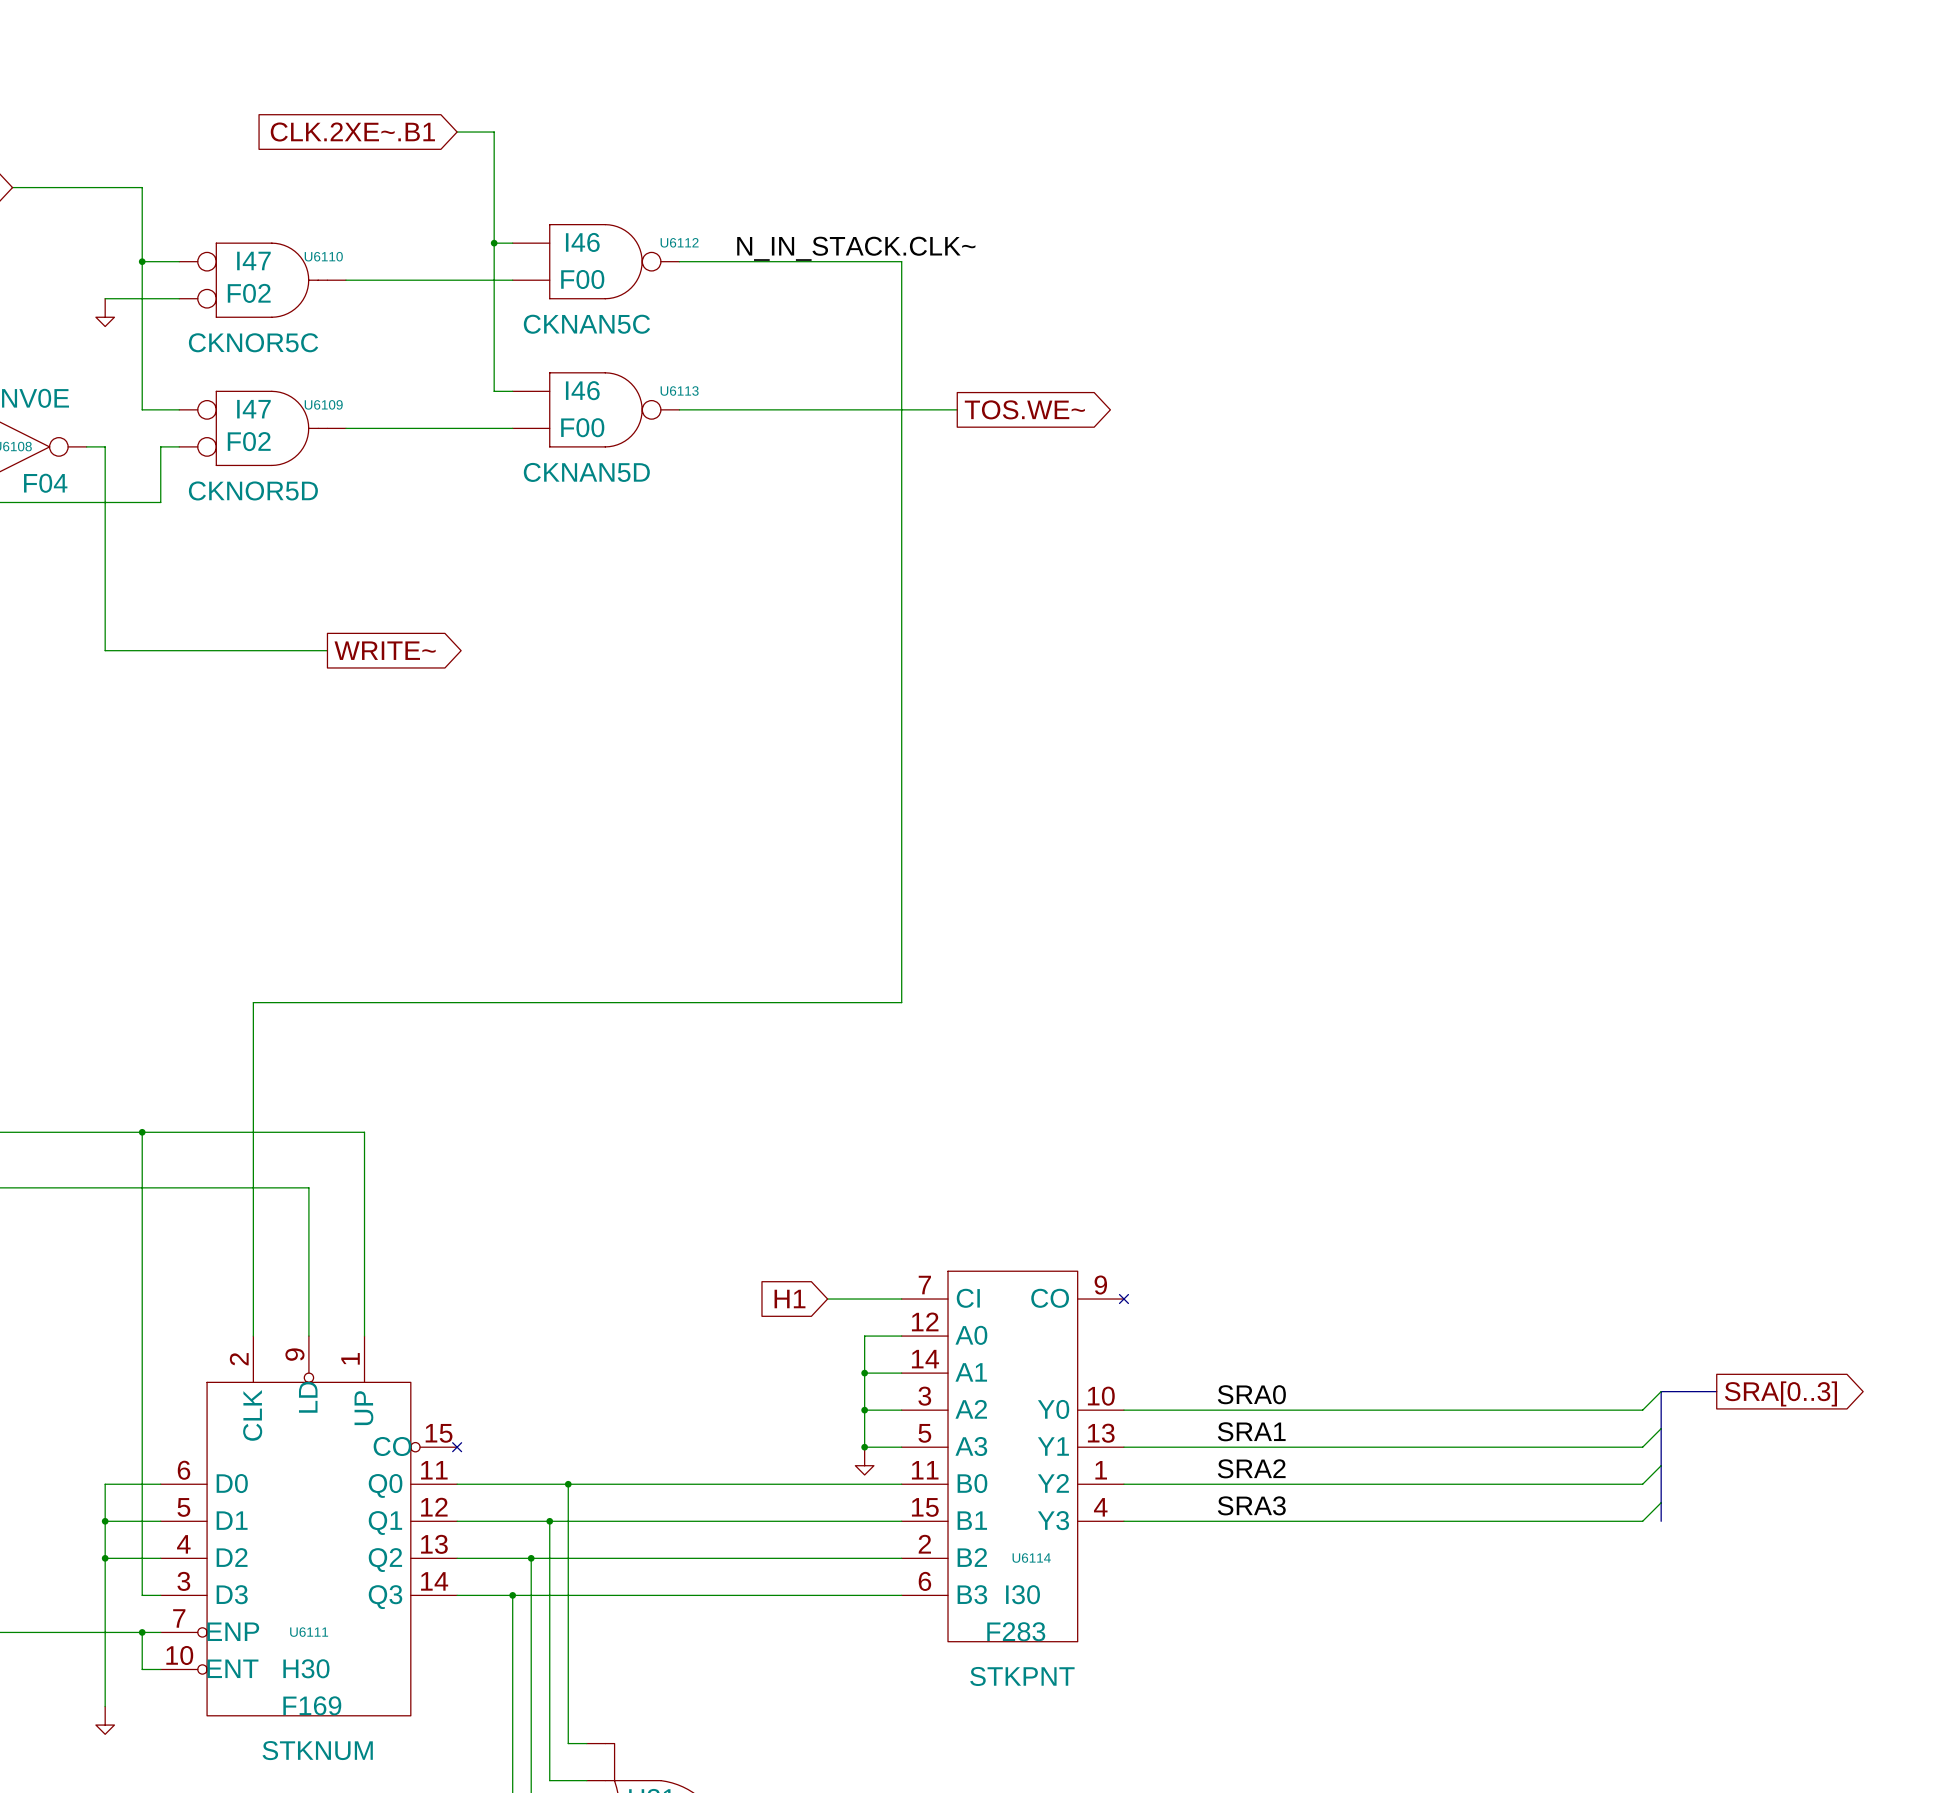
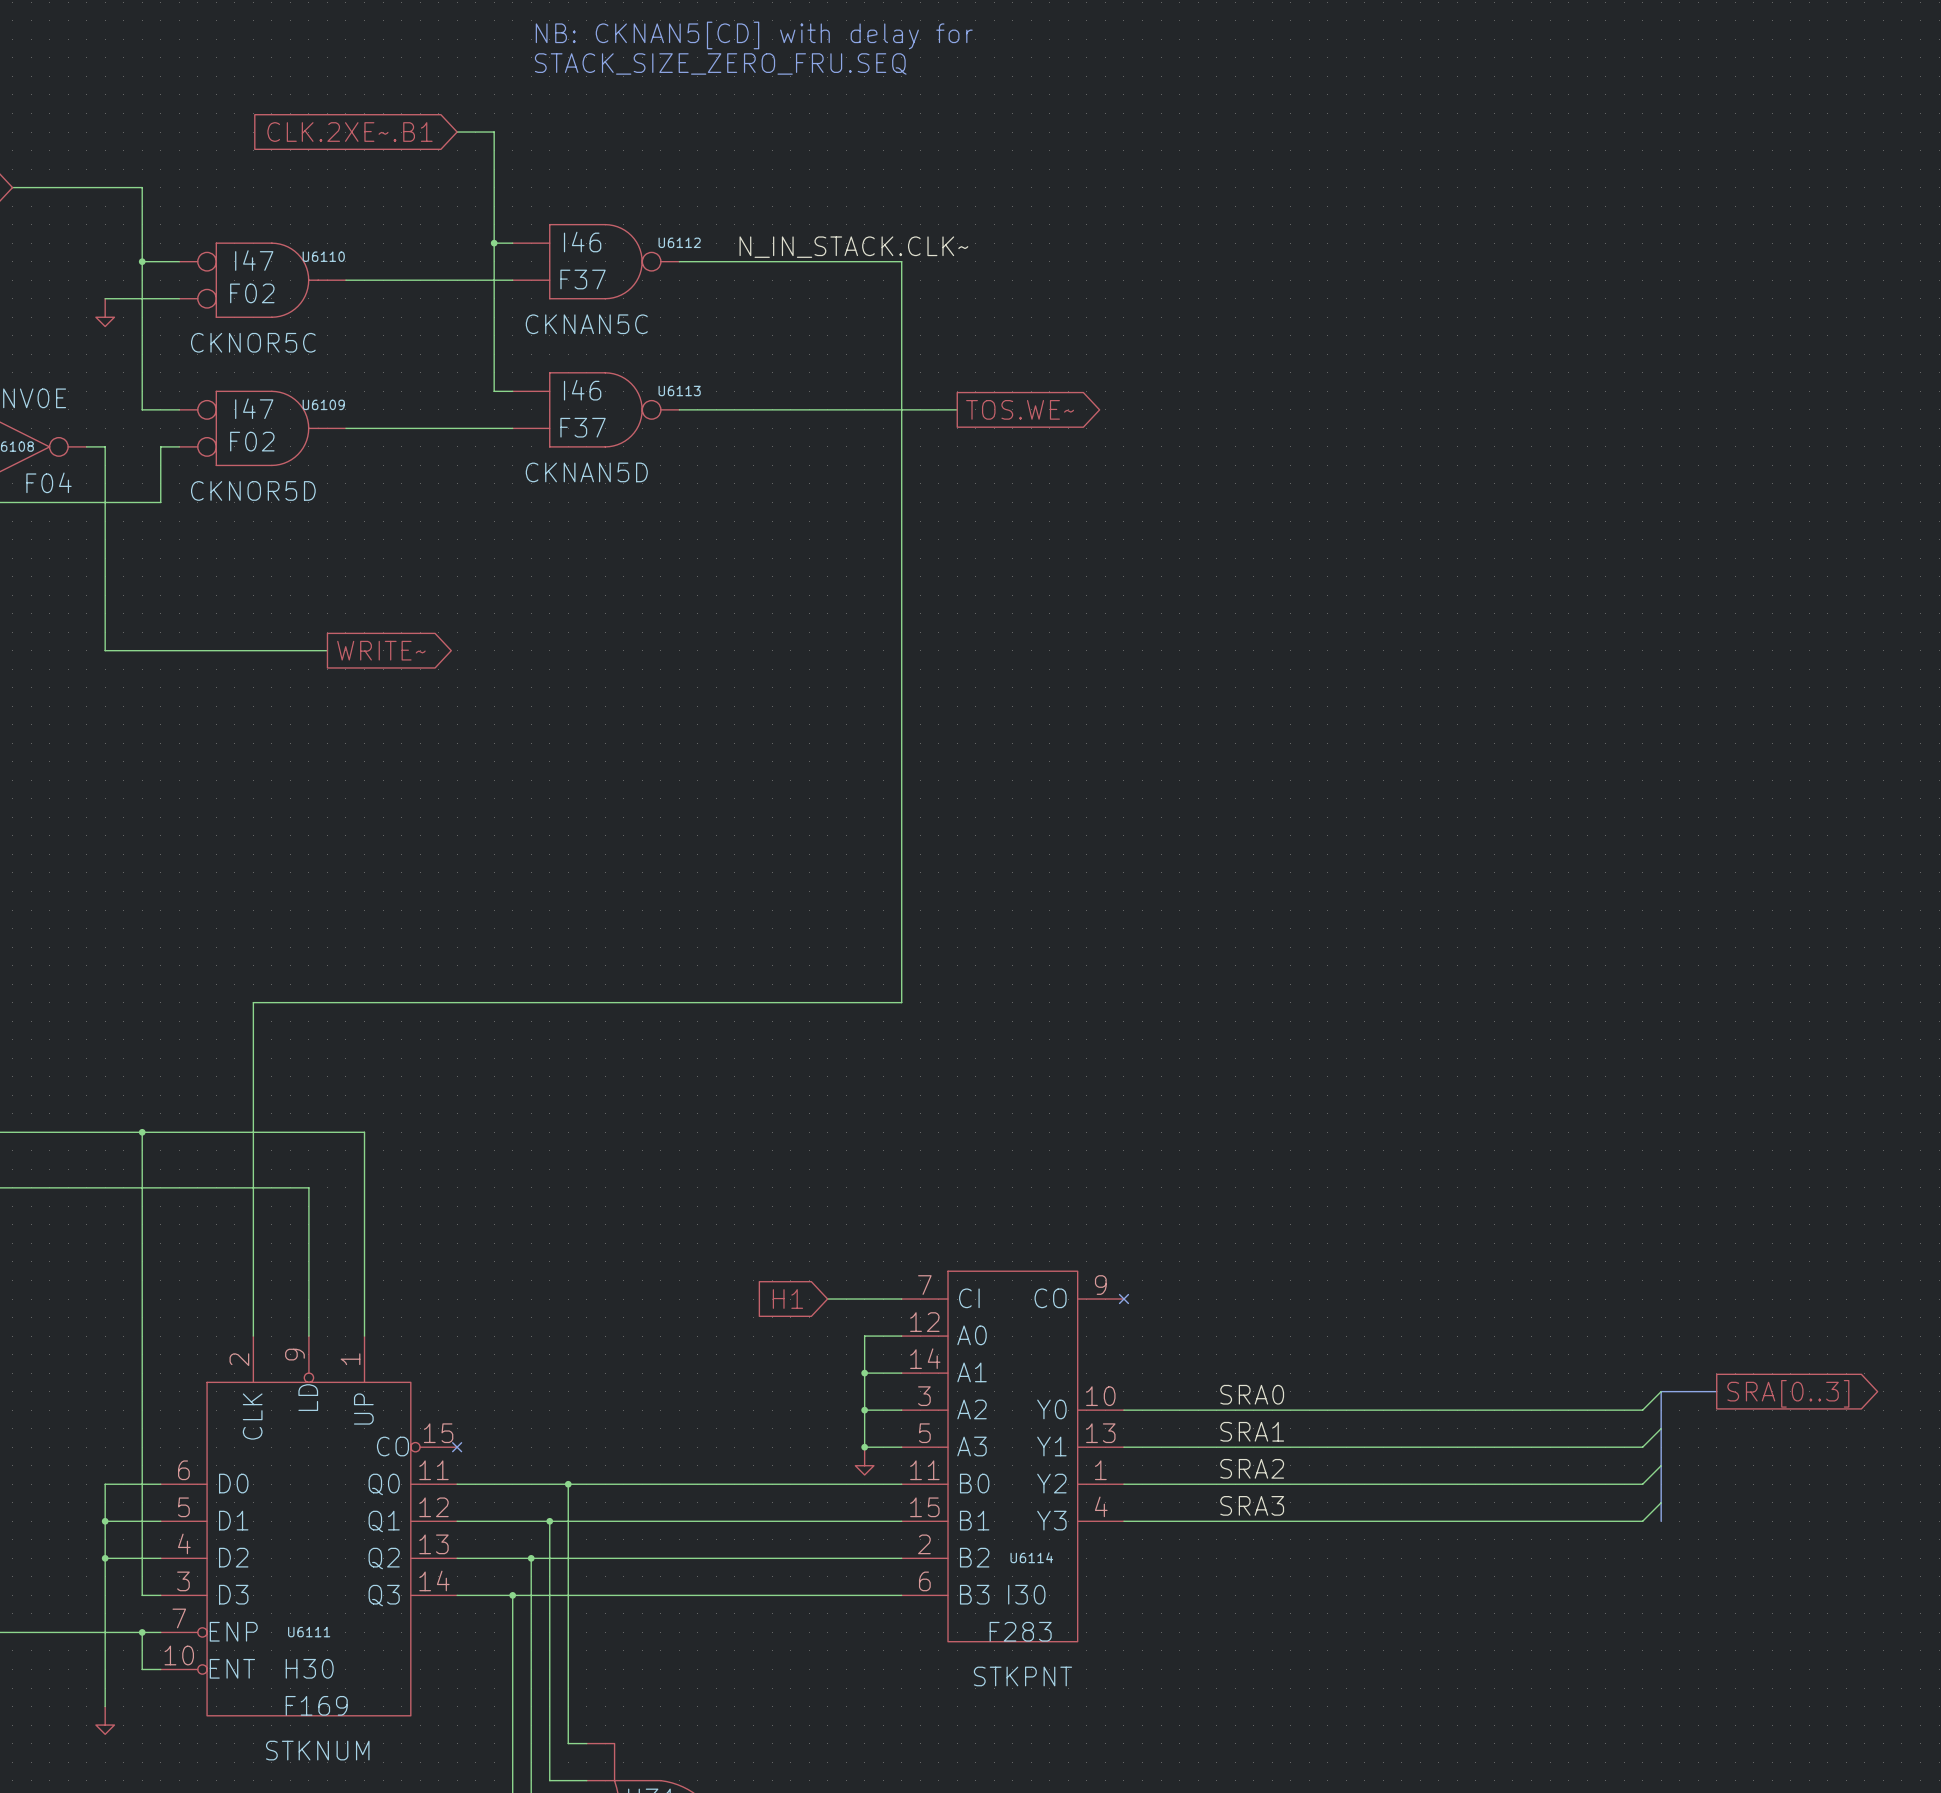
text: none -> NB: CKNAN5[CD] with delay for (754, 35)
text: none -> STACK_SIZE_ZERO_FRU.SEQ (720, 63)
U6112 value: F00 (582, 279) -> F37 (583, 279)
U6113 value: F00 (582, 427) -> F37 (583, 427)

